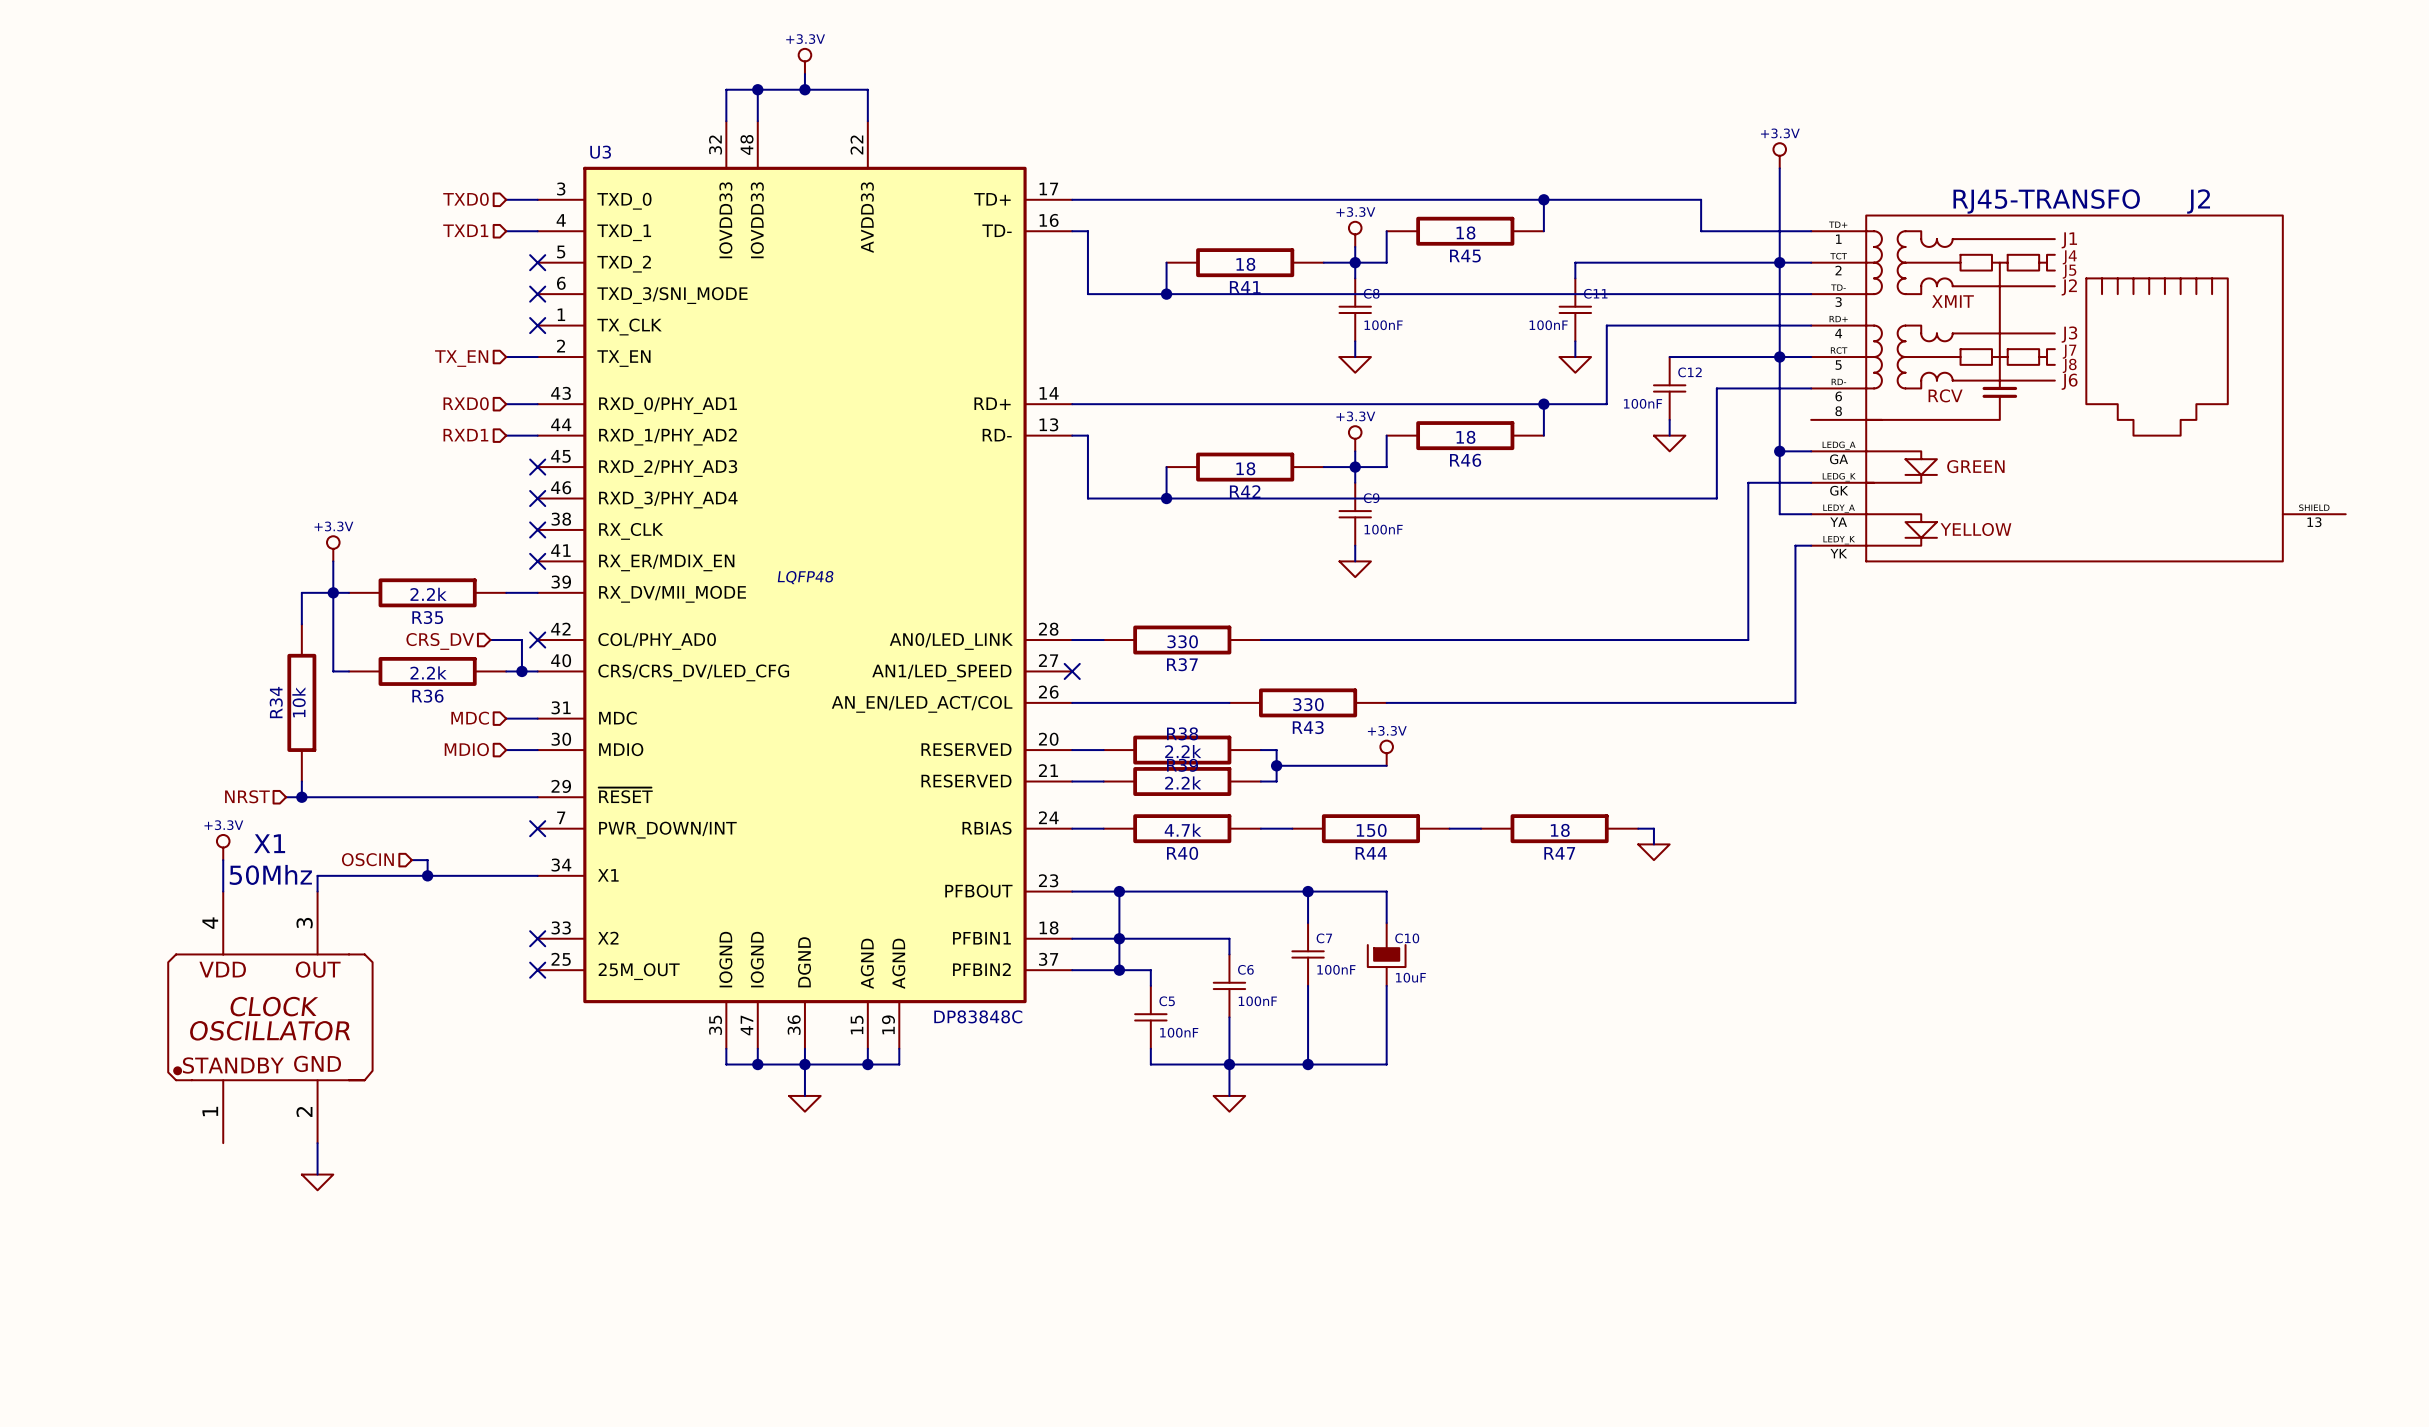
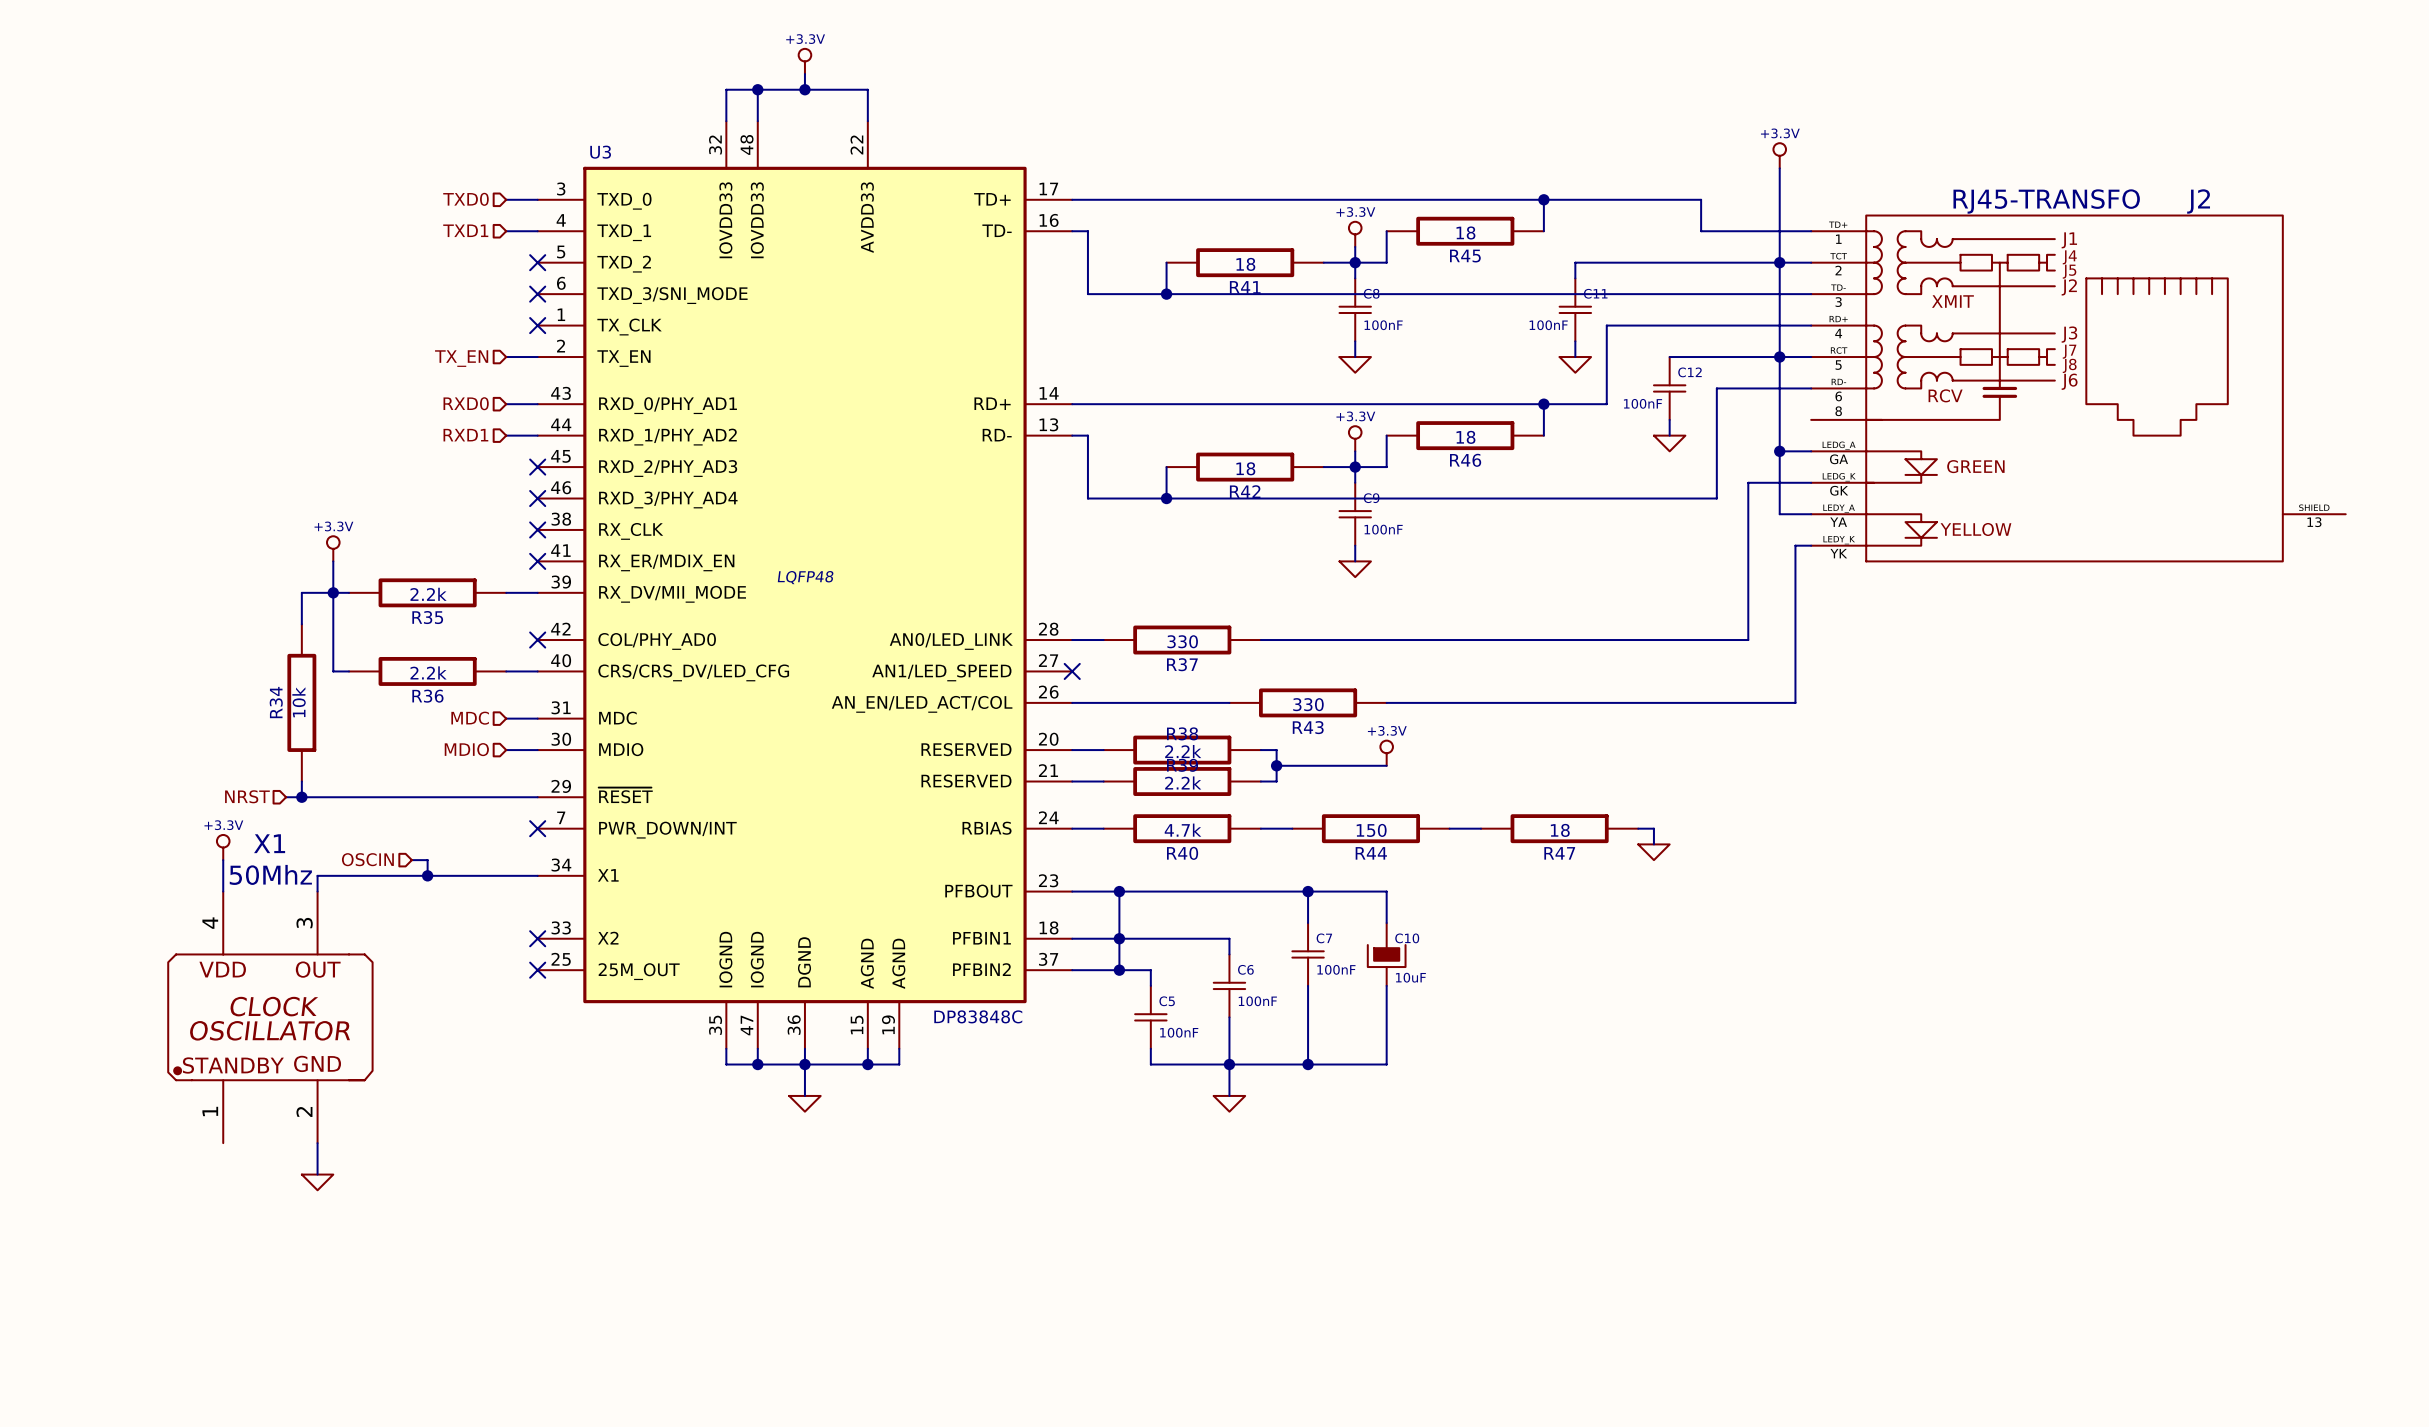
wire: (490, 640) (521, 640) (521, 671) -> none
hierarchical label: CRS_DV (440, 641) -> none
junction: (521, 671) -> none

